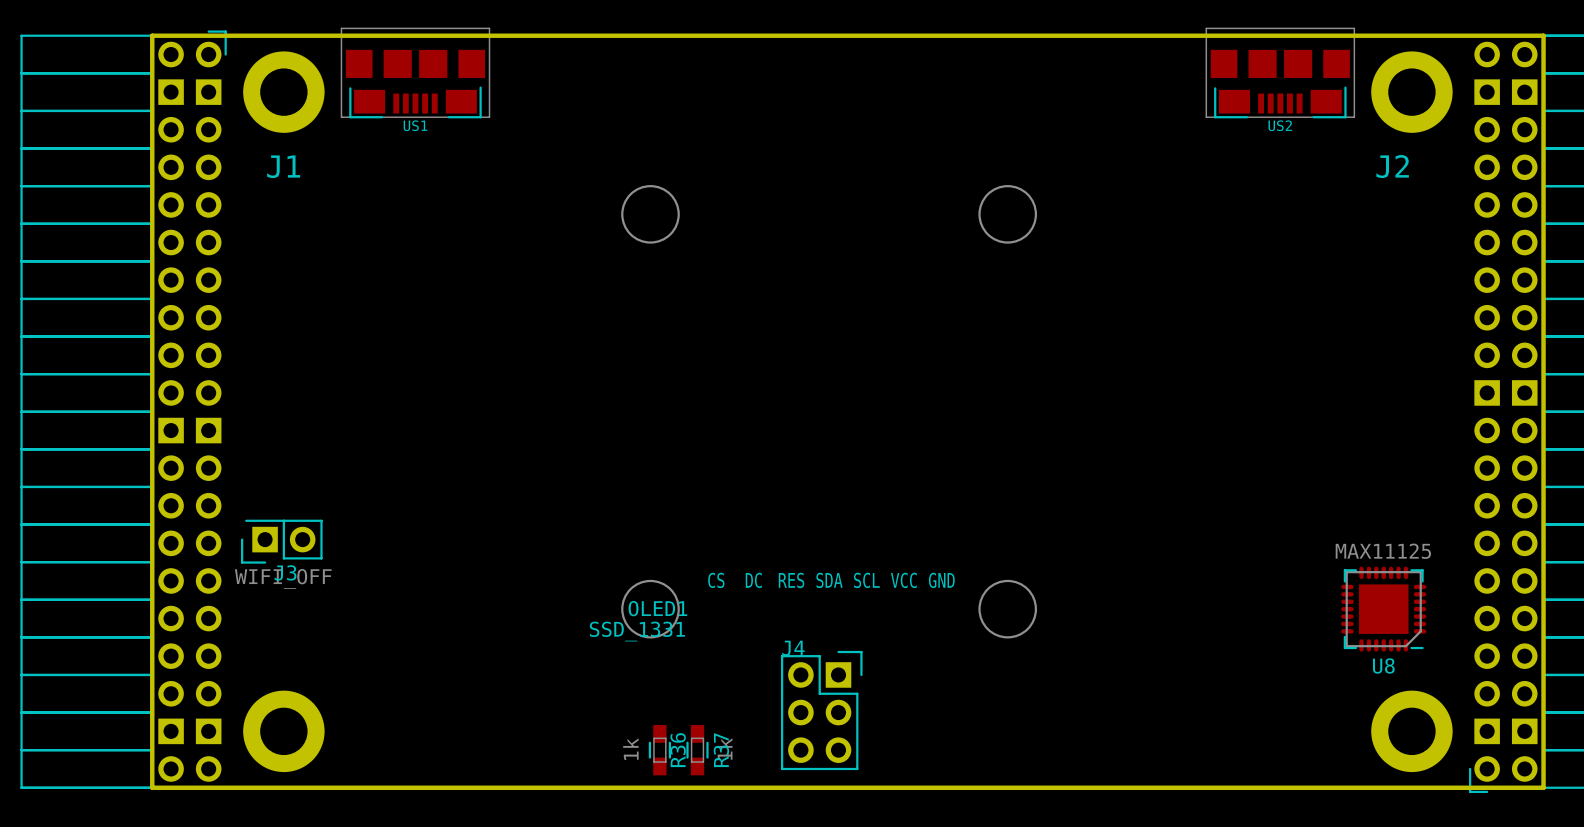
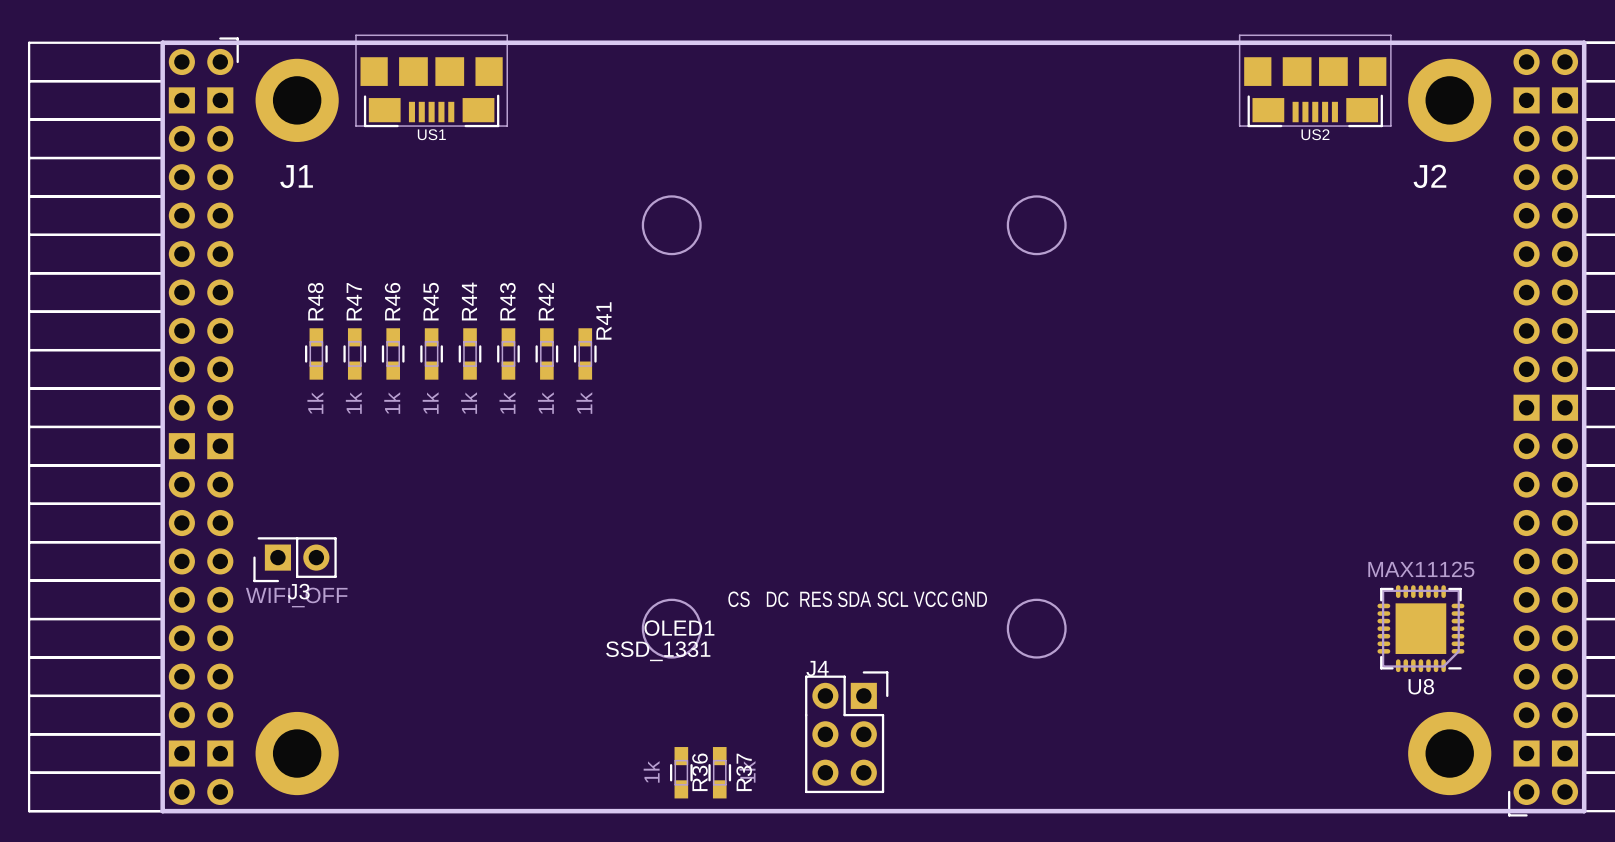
R48: none -> 1k (316, 353)
R47: none -> 1k (354, 353)
R46: none -> 1k (393, 353)
R45: none -> 1k (431, 353)
R44: none -> 1k (470, 353)
R43: none -> 1k (508, 353)
R42: none -> 1k (546, 353)
R41: none -> 1k (585, 353)

